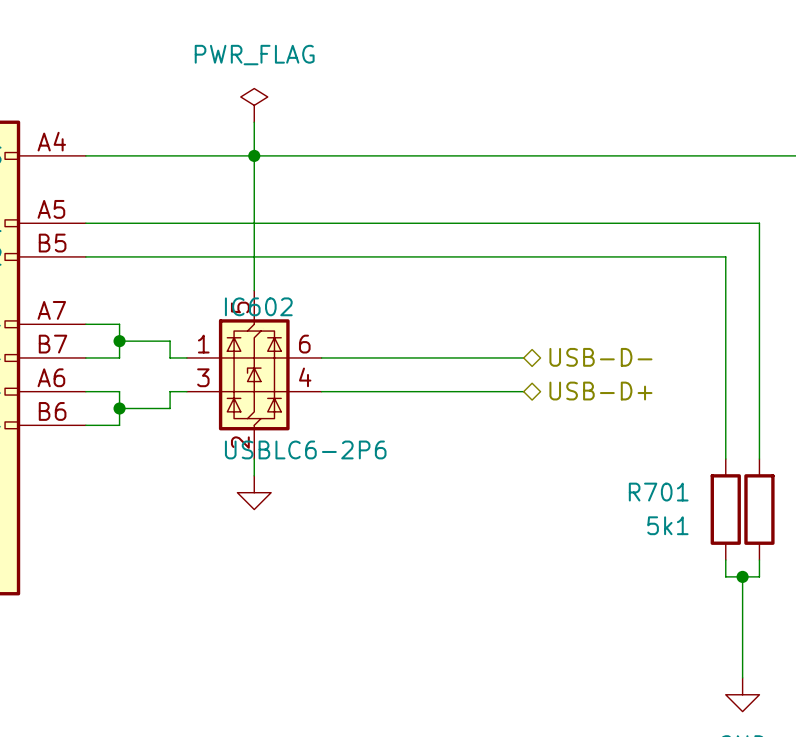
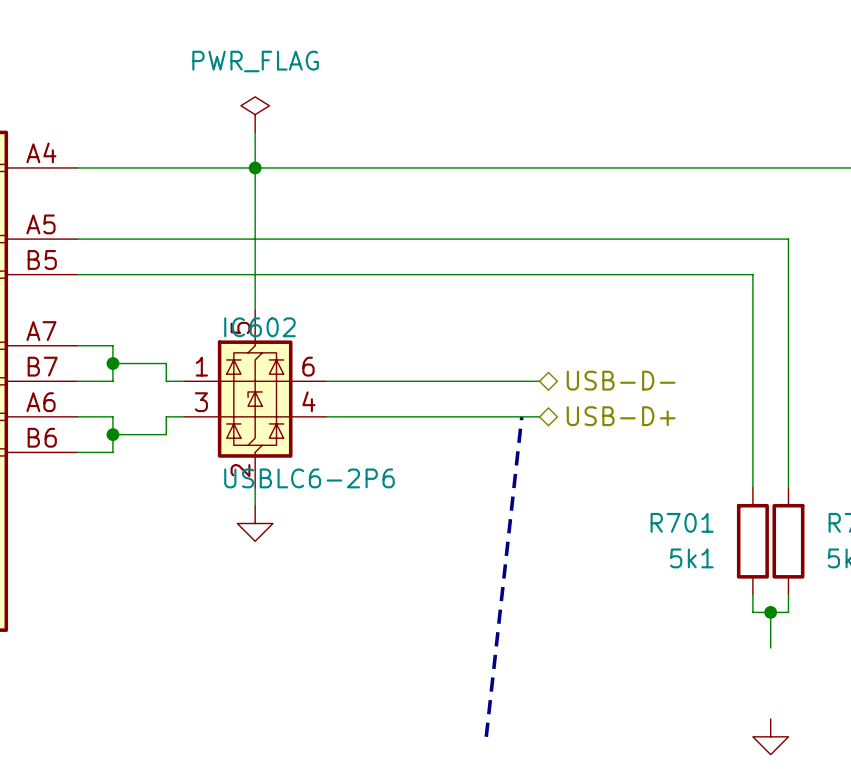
line: none -> (521, 416) (486, 736)
wire: (742, 610) (742, 677) -> none

